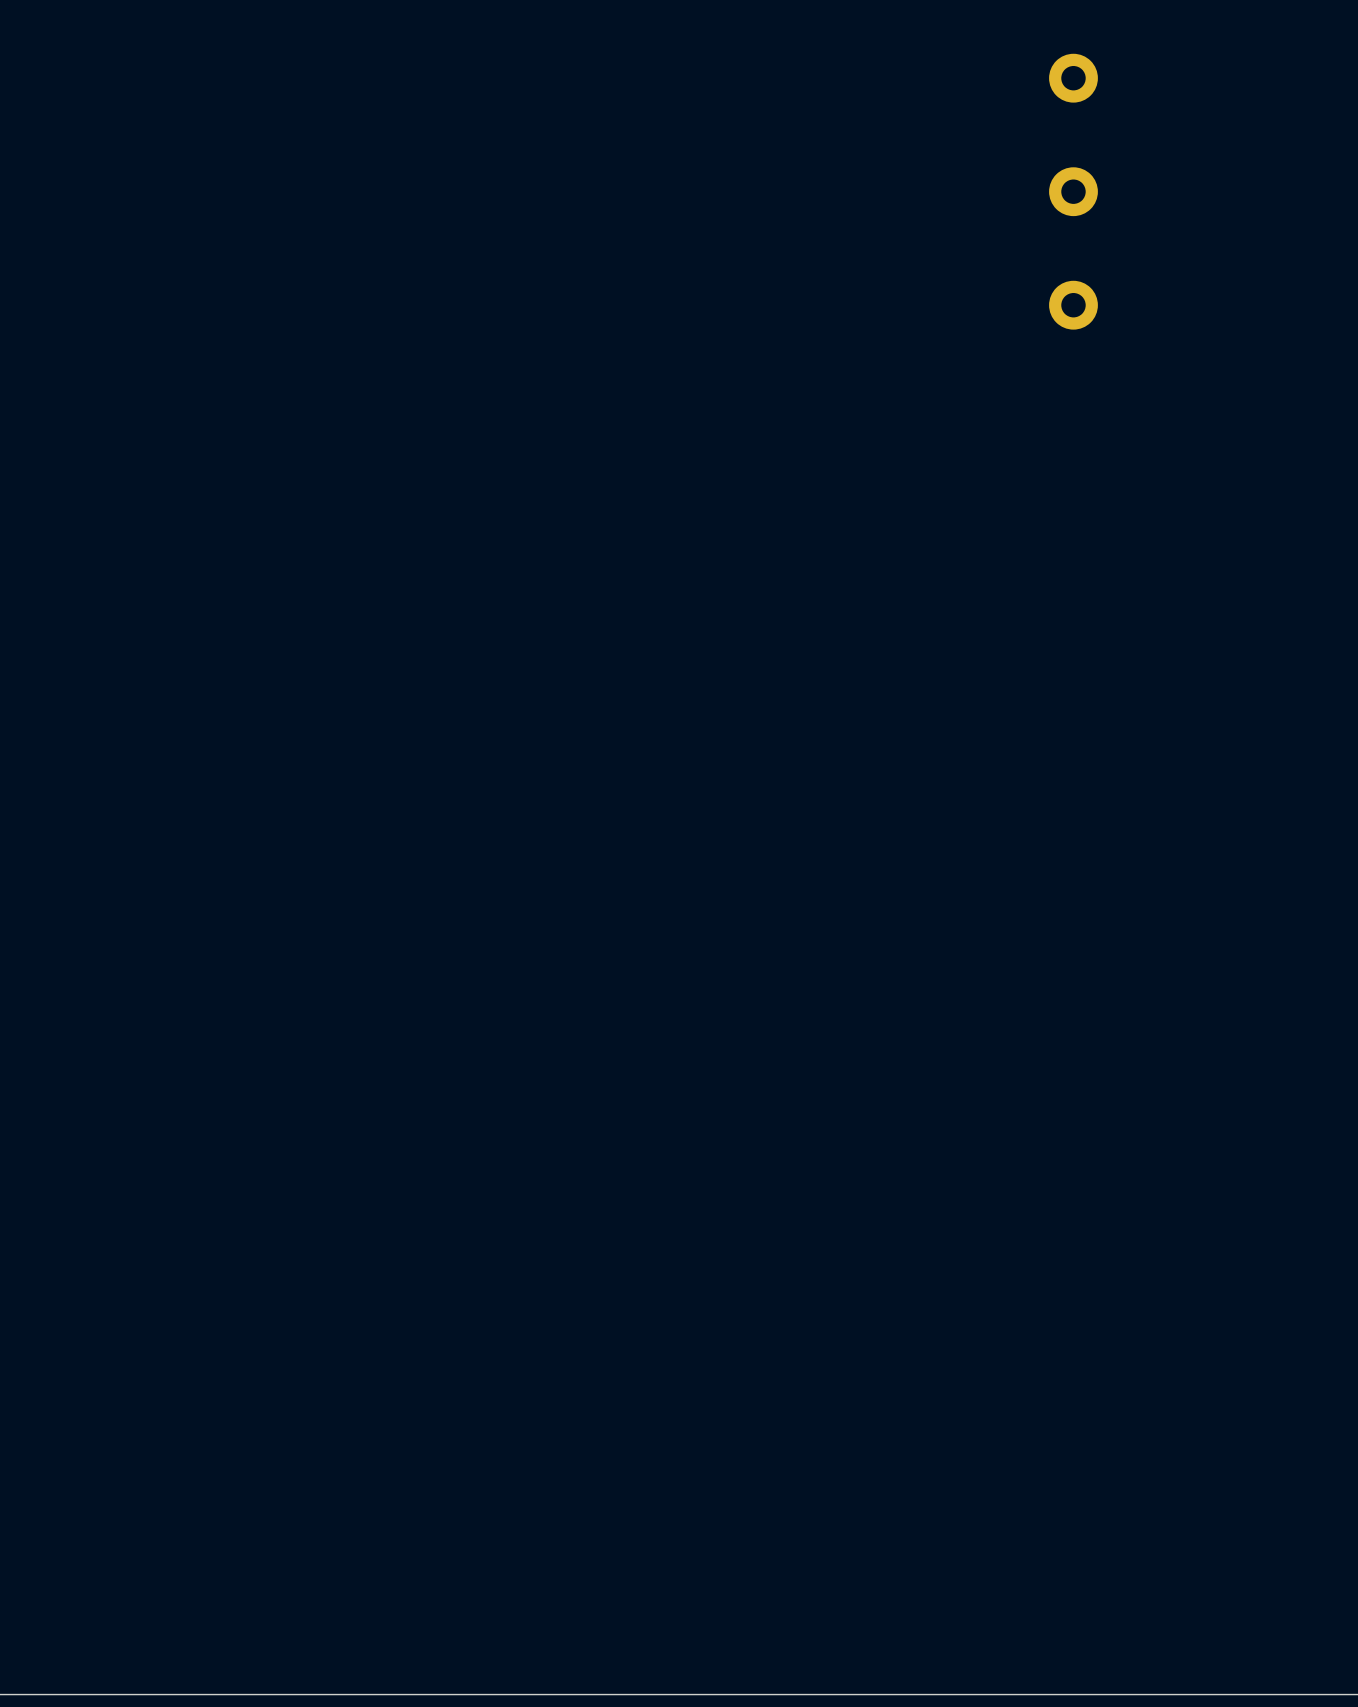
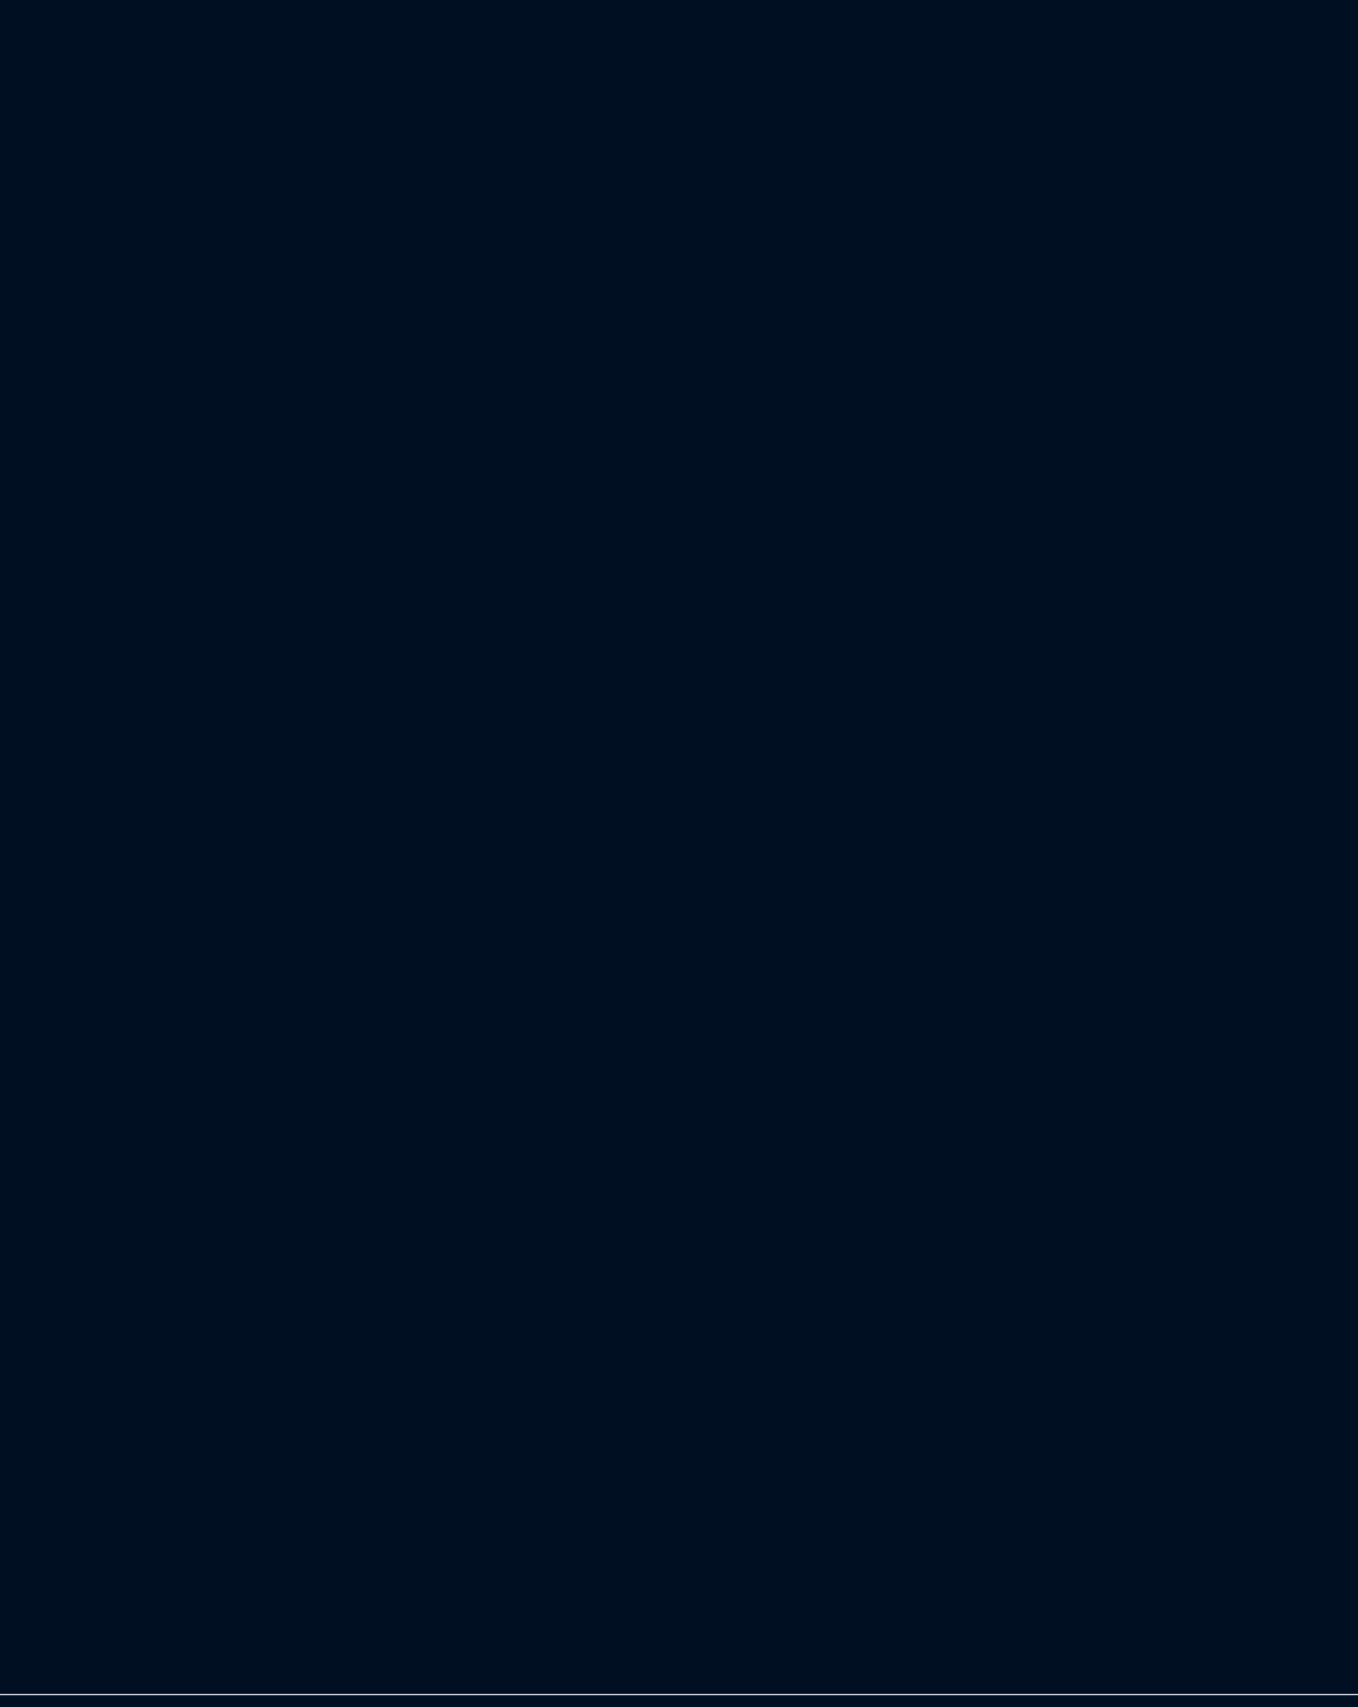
part: (1073, 78) -> none
part: (1073, 191) -> none
part: (1073, 305) -> none

